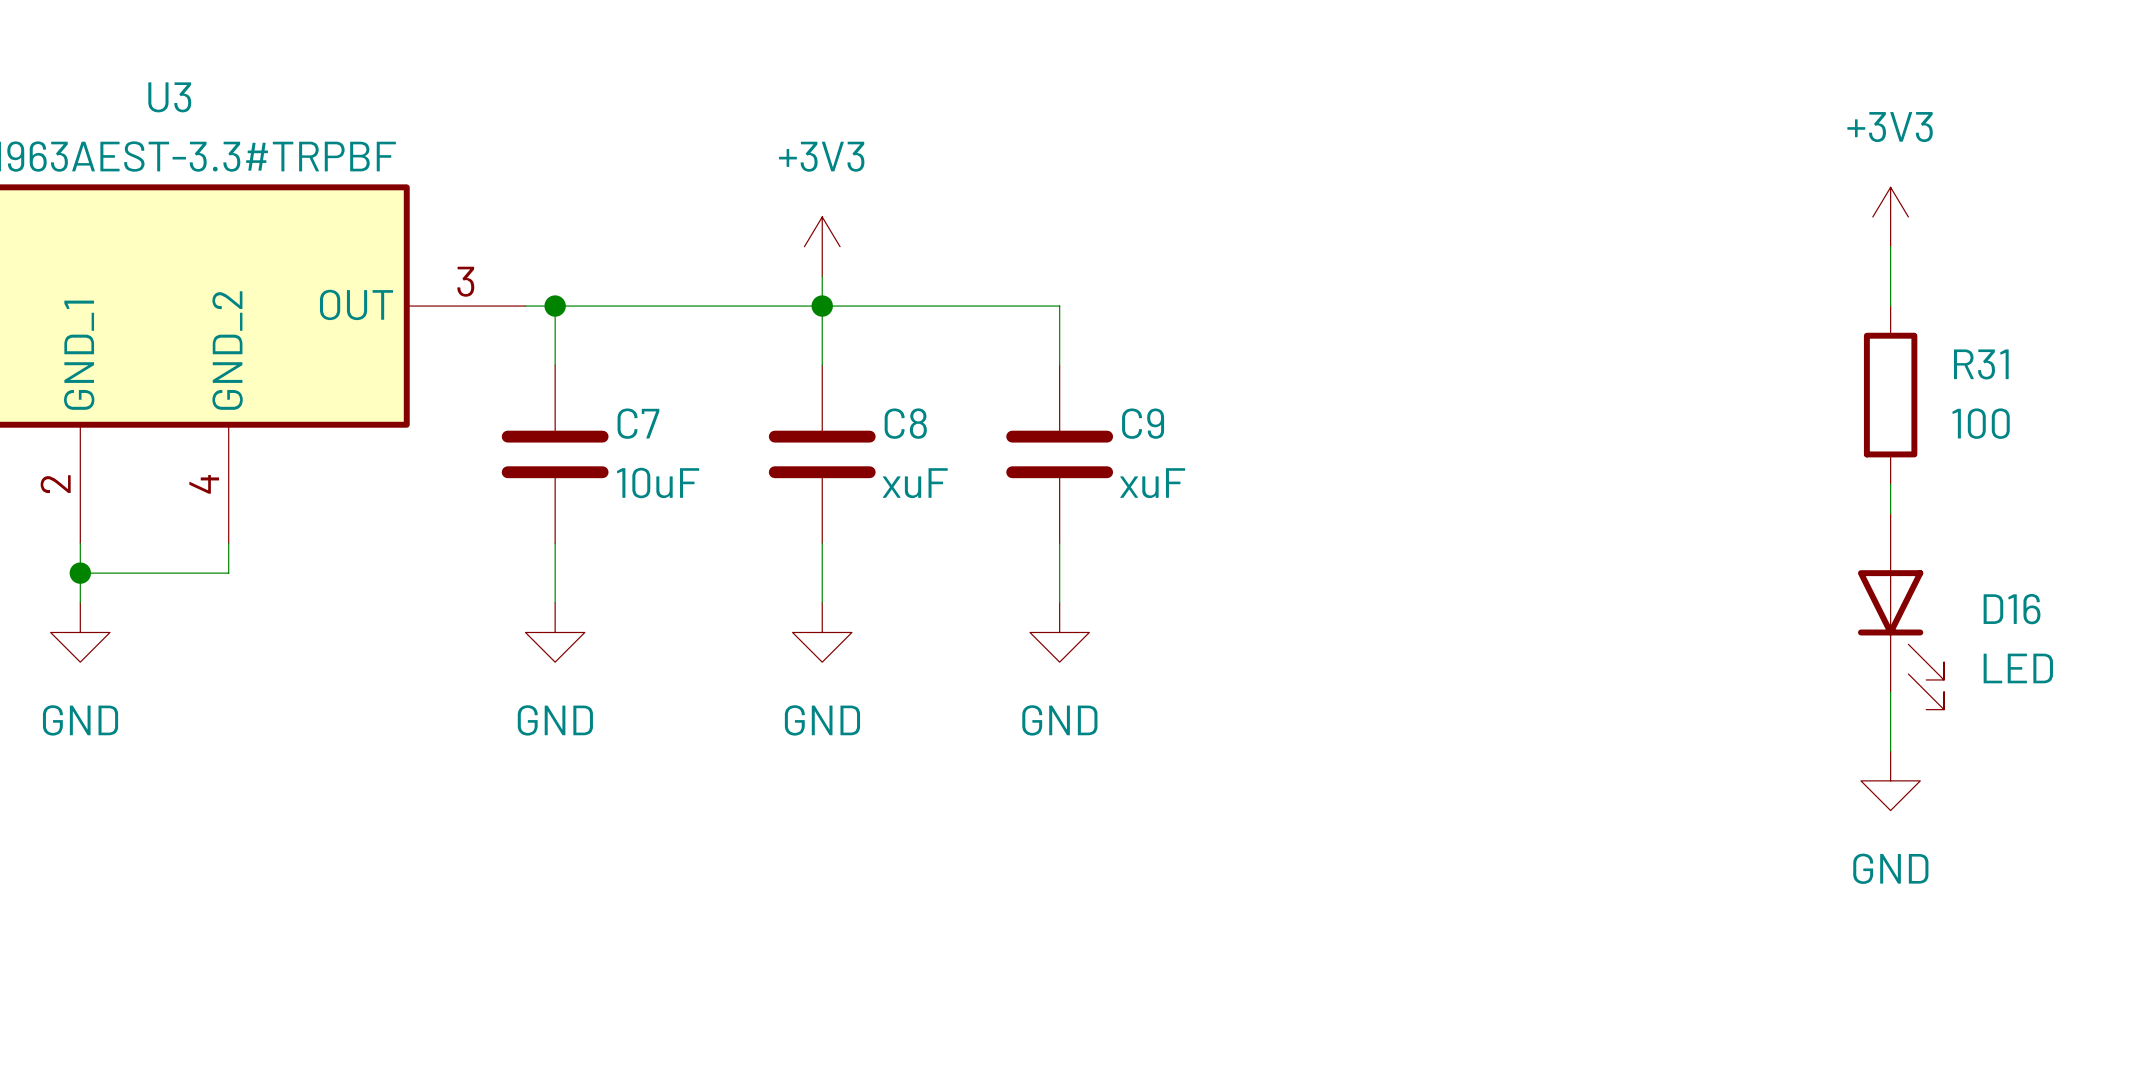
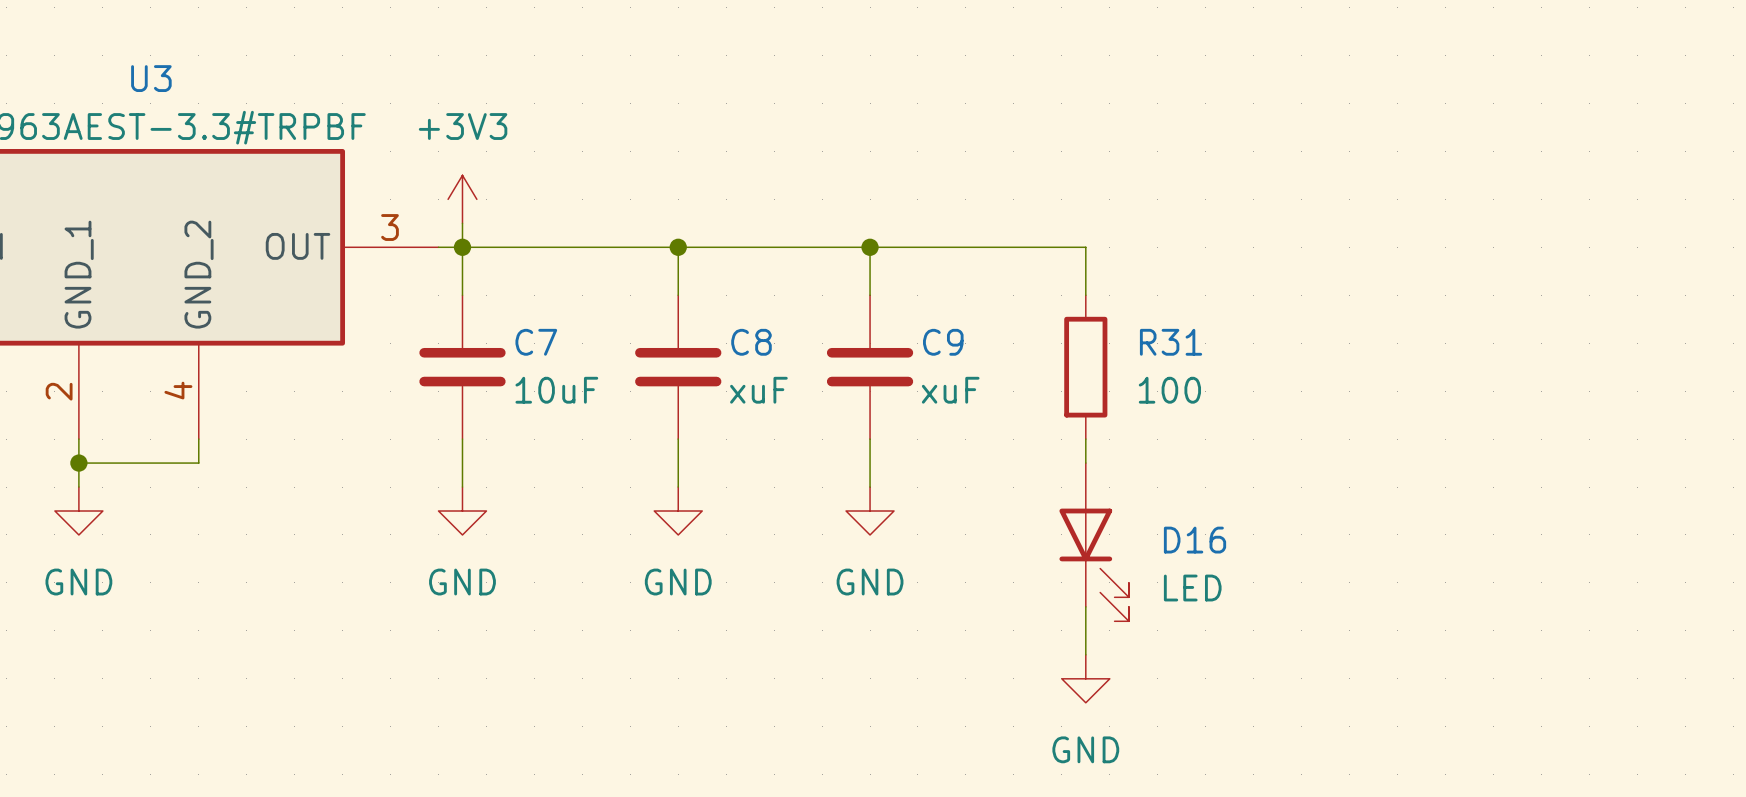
power symbol: +3V3 (1890, 217) -> none
power symbol position: +3V3 (822, 246) -> +3V3 (462, 199)
wire: (1890, 246) (1890, 306) -> none
wire: (822, 276) (822, 306) -> (462, 223) (462, 247)
wire: none -> (870, 247) (1085, 247) (1085, 295)
junction: none -> (870, 247)
R31 position: (1890, 395) -> (1085, 367)
wire: (1890, 484) (1890, 513) -> (1085, 439) (1085, 463)
D16 position: (1901, 611) -> (1094, 542)
wire: (1890, 691) (1890, 751) -> (1085, 606) (1085, 654)
power symbol position: GND (1890, 780) -> GND (1085, 678)

